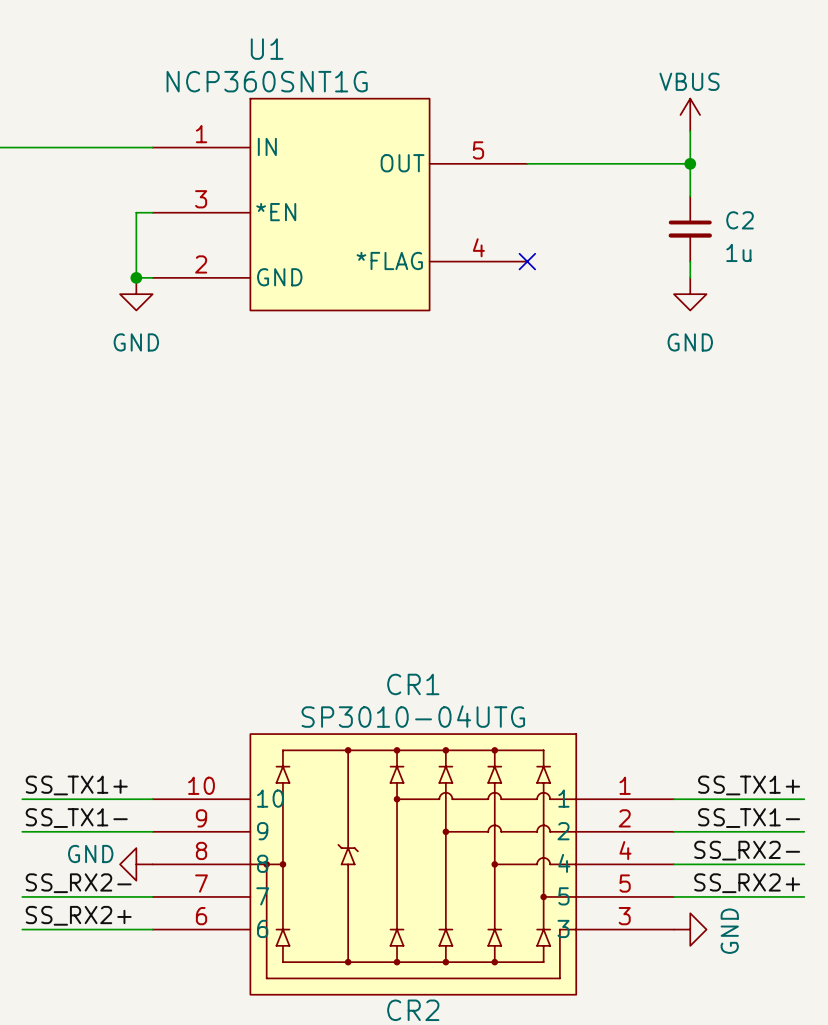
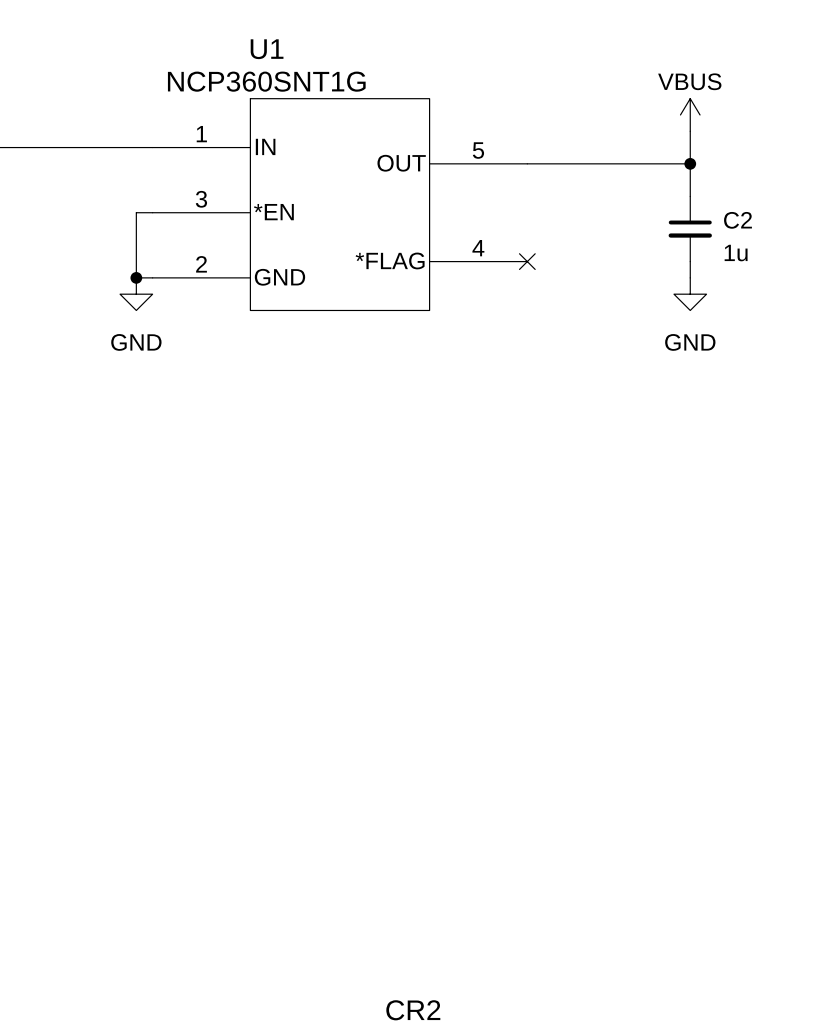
label: SS_TX1+ (76, 785) -> none
label: SS_TX1+ (749, 785) -> none
wire: (22, 799) (152, 799) -> none
wire: (673, 799) (804, 799) -> none
label: SS_TX1- (76, 818) -> none
label: SS_TX1- (749, 818) -> none
wire: (22, 831) (152, 831) -> none
wire: (673, 831) (804, 831) -> none
label: SS_RX2- (747, 850) -> none
power symbol: GND (136, 864) -> none
CR1: SP3010-04UTG (413, 864) -> none
wire: (673, 864) (804, 864) -> none
label: SS_RX2- (78, 883) -> none
label: SS_RX2+ (747, 883) -> none
wire: (22, 896) (152, 896) -> none
wire: (673, 896) (804, 896) -> none
label: SS_RX2+ (78, 915) -> none
wire: (22, 929) (152, 929) -> none
power symbol: GND (690, 929) -> none

